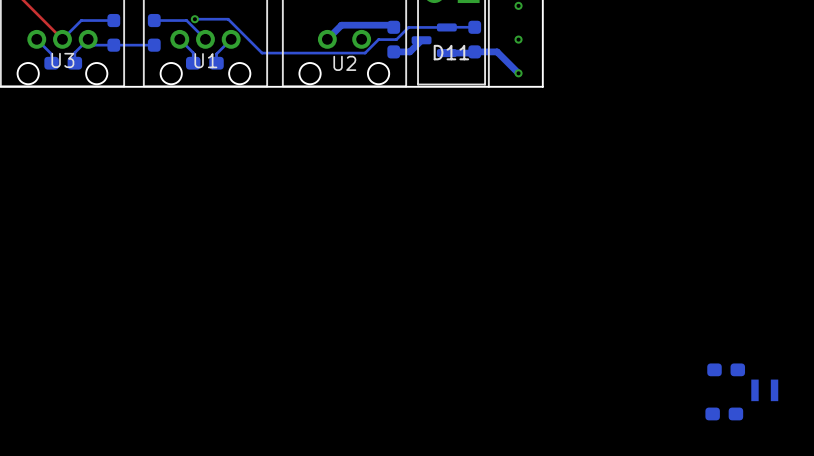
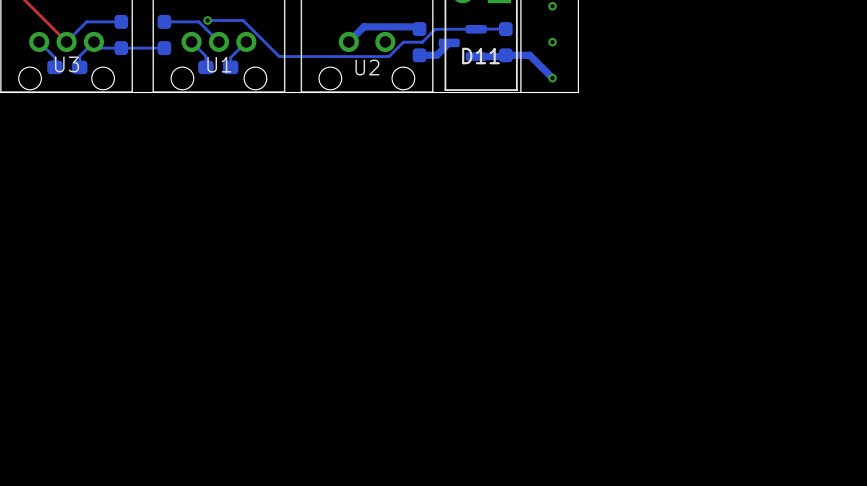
part: (726, 369) -> none
part: (764, 390) -> none
part: (724, 413) -> none

